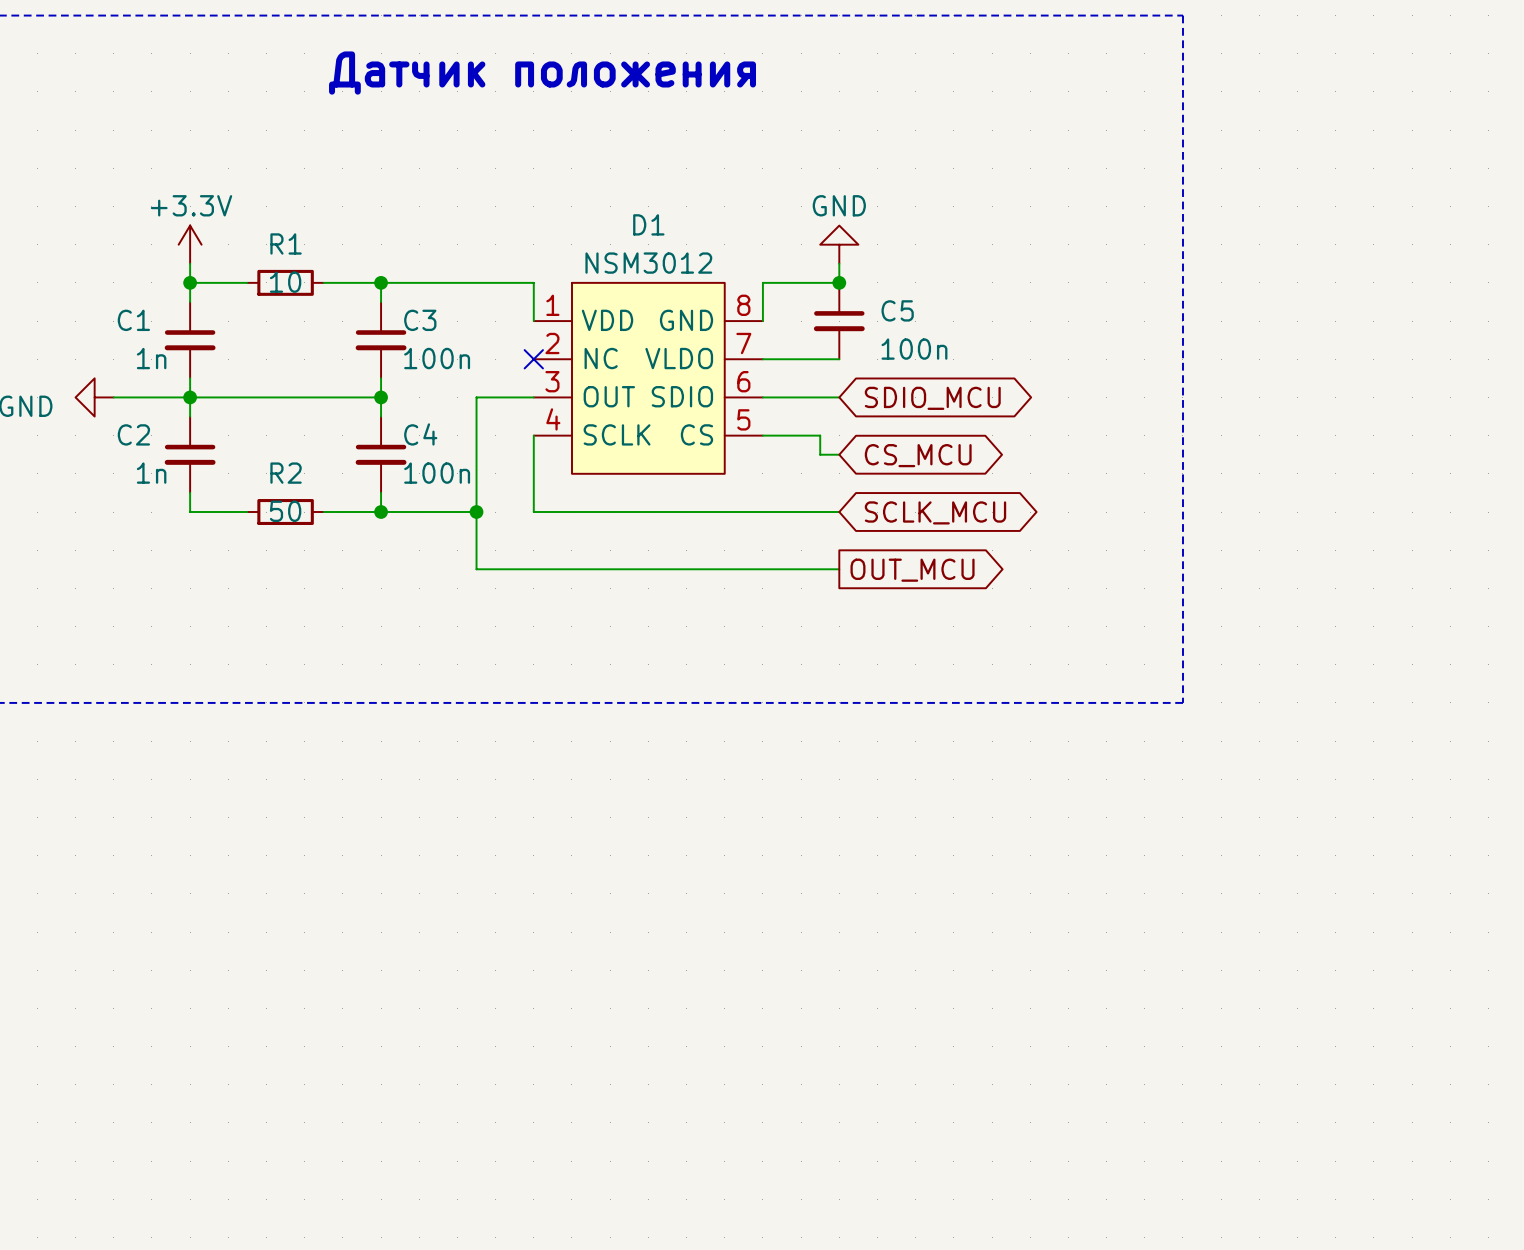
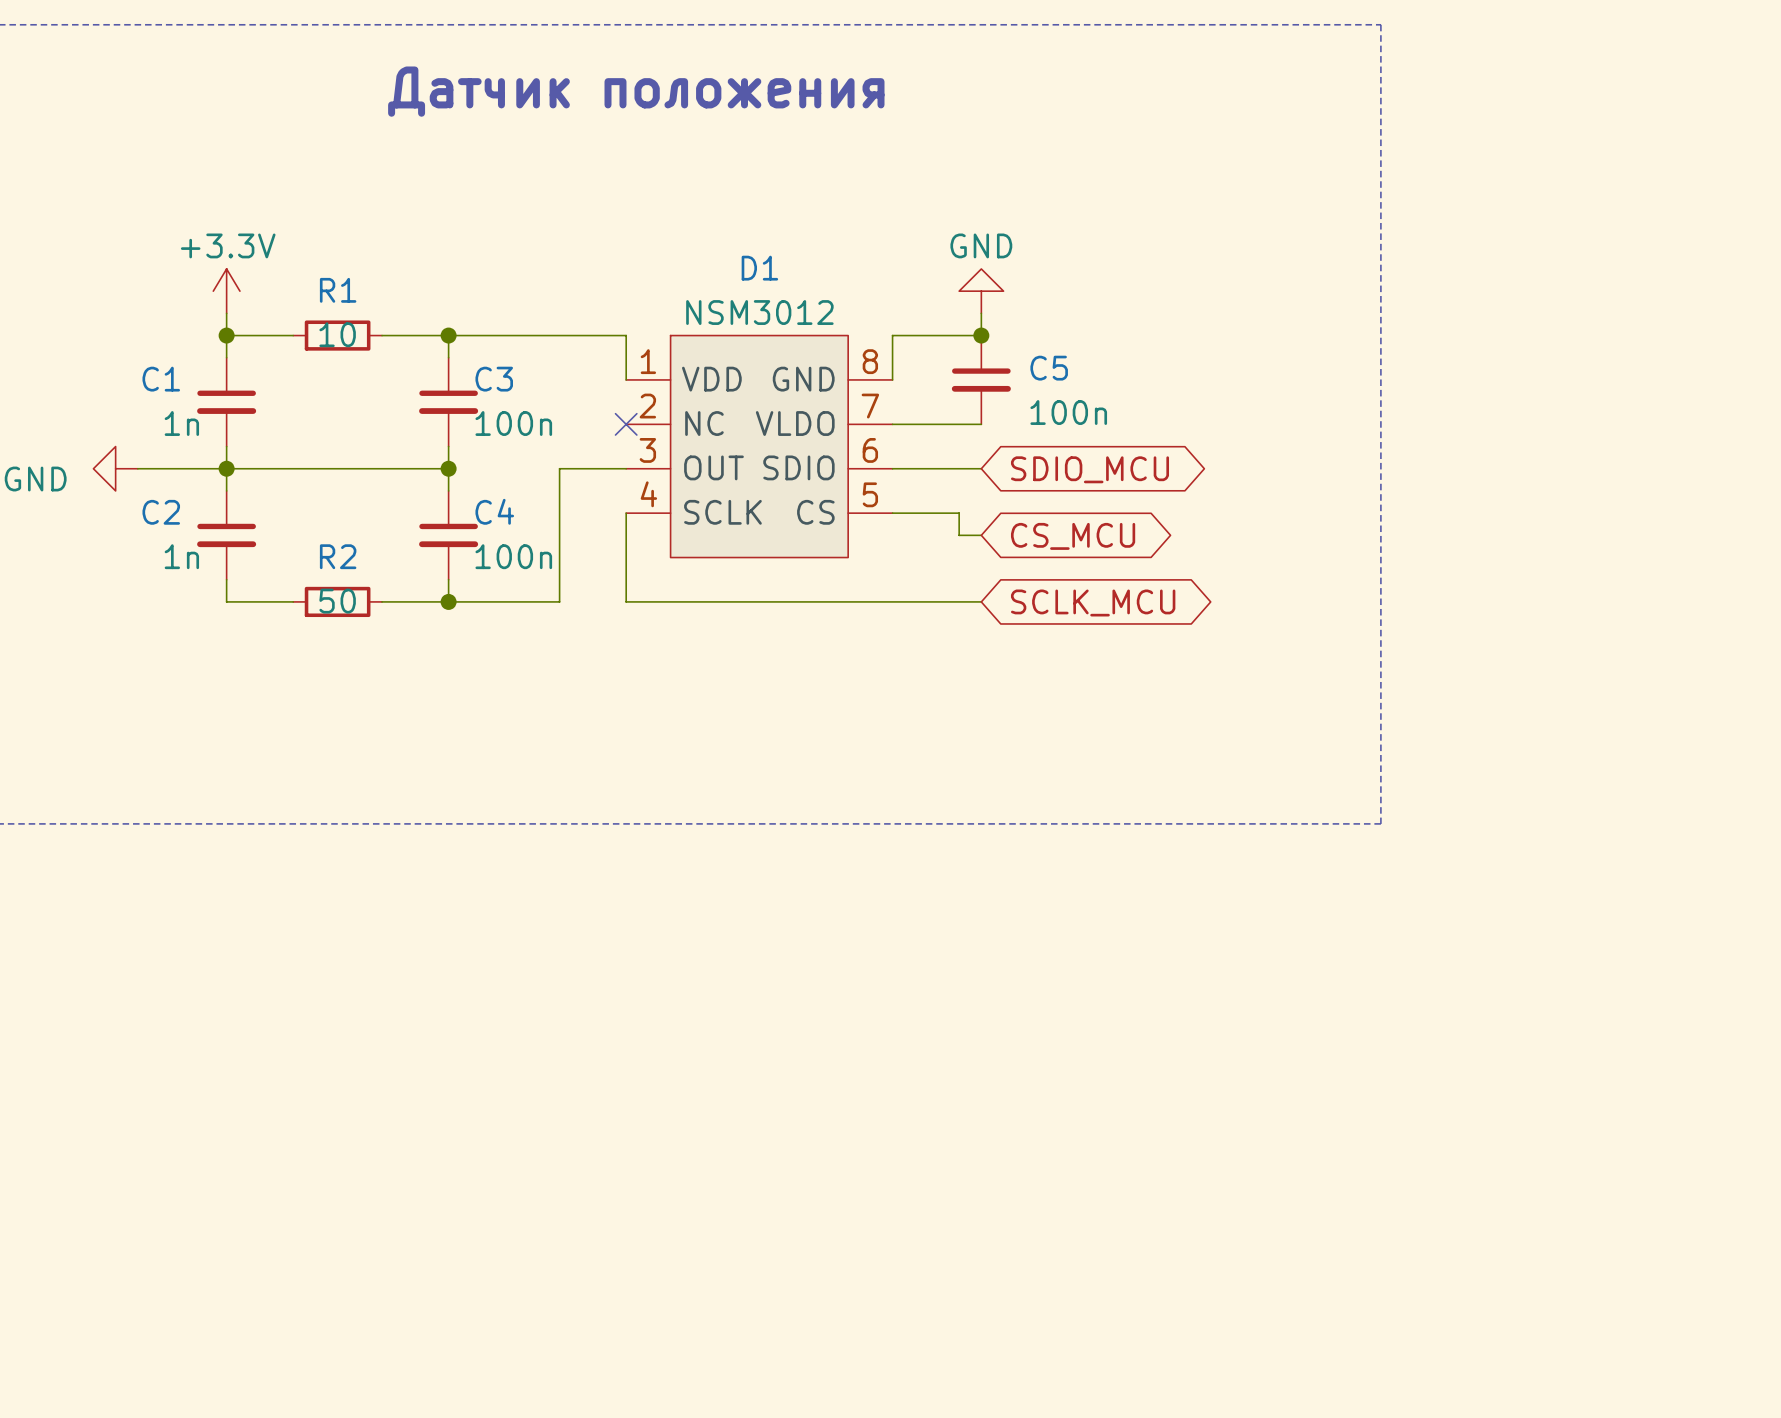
wire: (476, 512) (476, 569) (839, 569) -> none
junction: (476, 512) -> none
global label: OUT_MCU (912, 570) -> none

